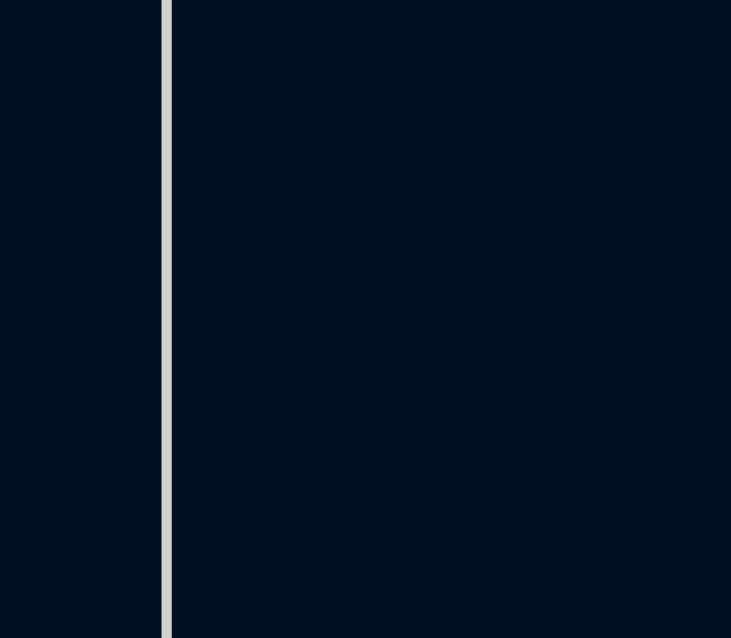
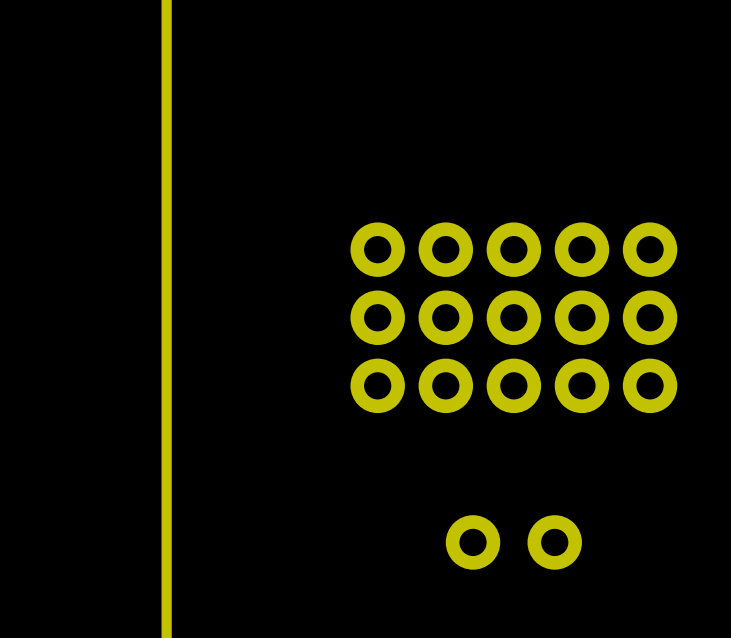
part: none -> (377, 249)
part: none -> (445, 249)
part: none -> (513, 249)
part: none -> (581, 249)
part: none -> (650, 249)
part: none -> (377, 317)
part: none -> (445, 317)
part: none -> (513, 317)
part: none -> (581, 317)
part: none -> (650, 317)
part: none -> (377, 385)
part: none -> (445, 385)
part: none -> (513, 385)
part: none -> (581, 385)
part: none -> (650, 385)
part: none -> (473, 542)
part: none -> (554, 542)

